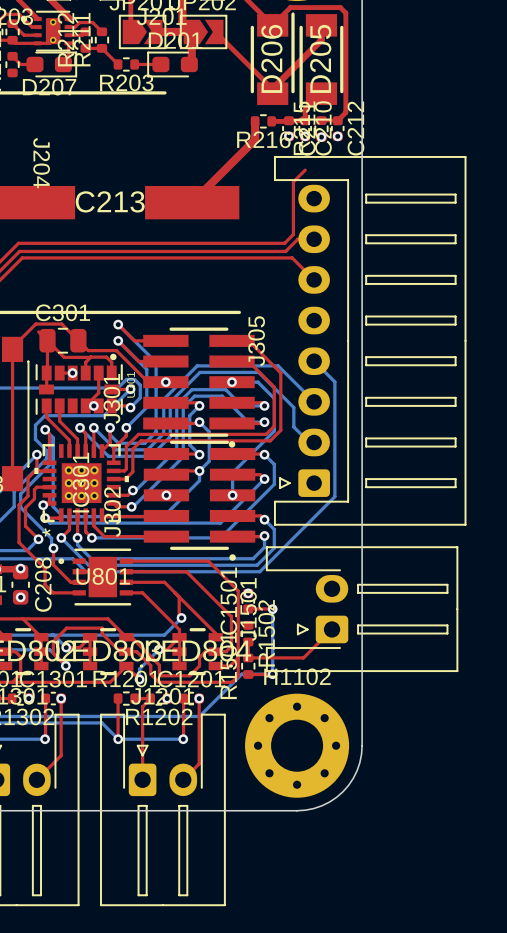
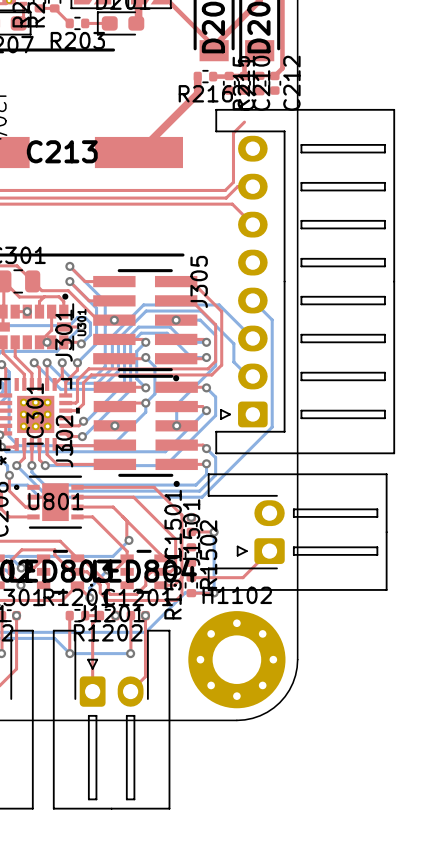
via: (288, 136) -> none
via: (305, 136) -> none
via: (337, 136) -> none
via: (321, 137) -> none

